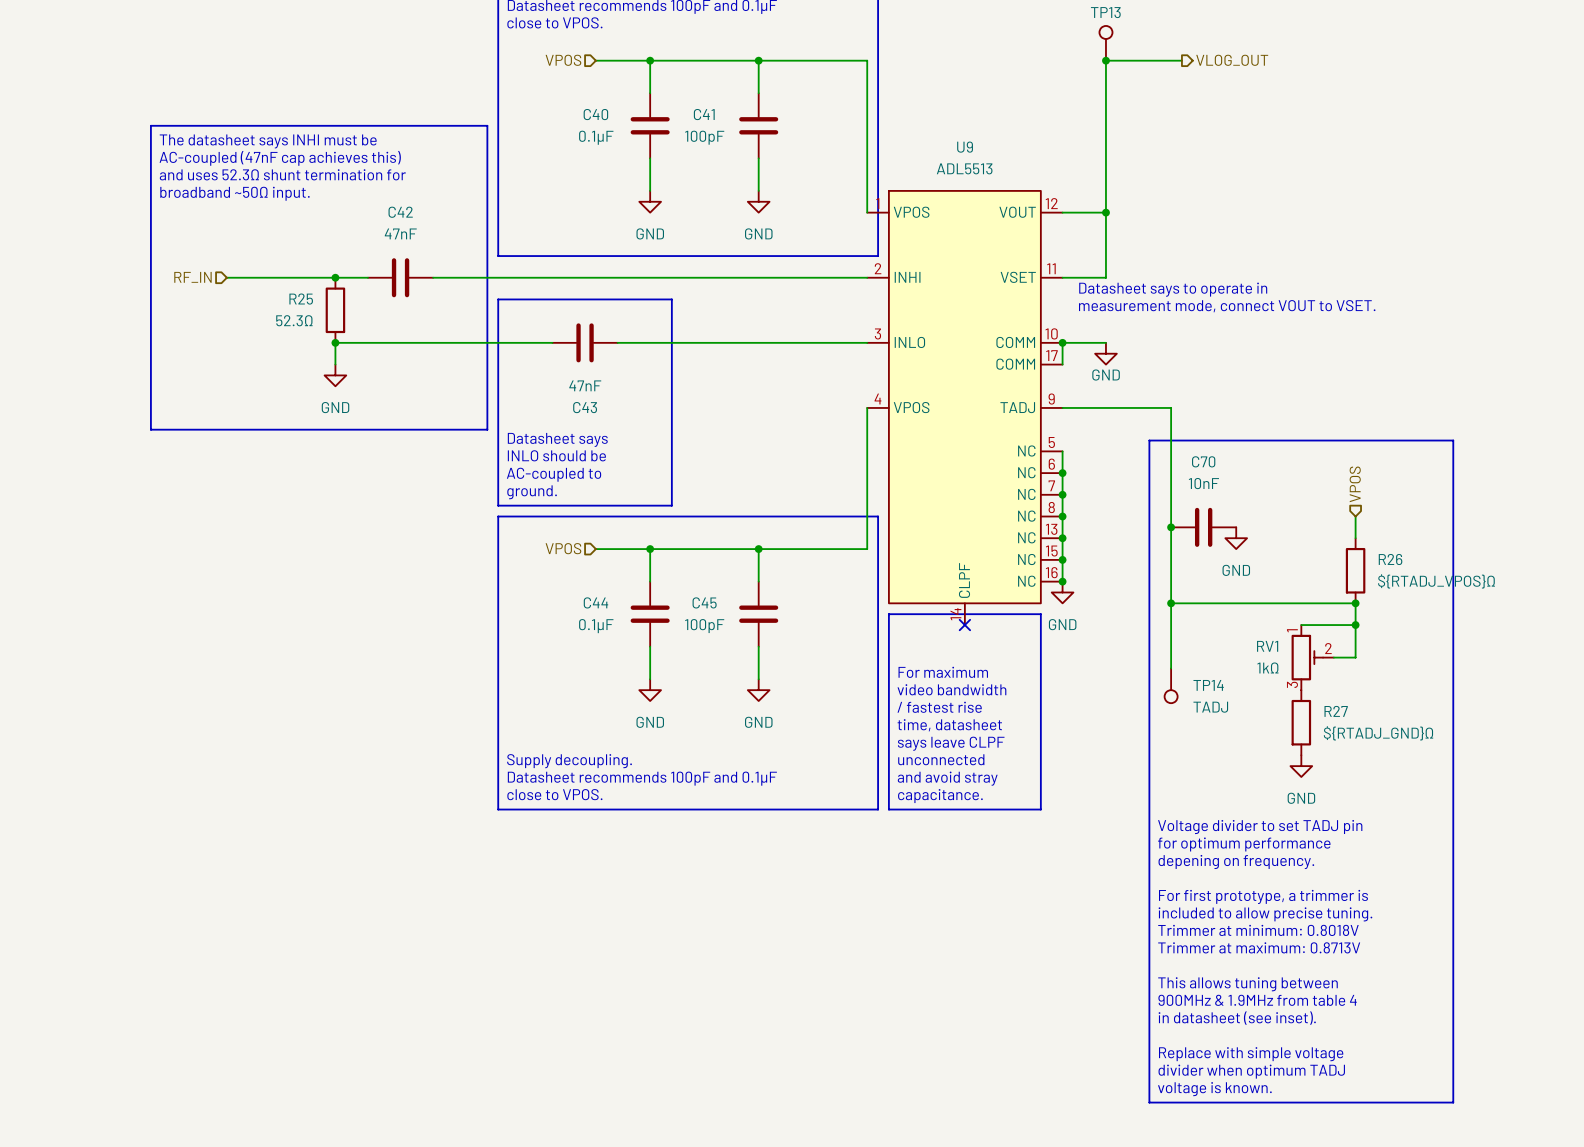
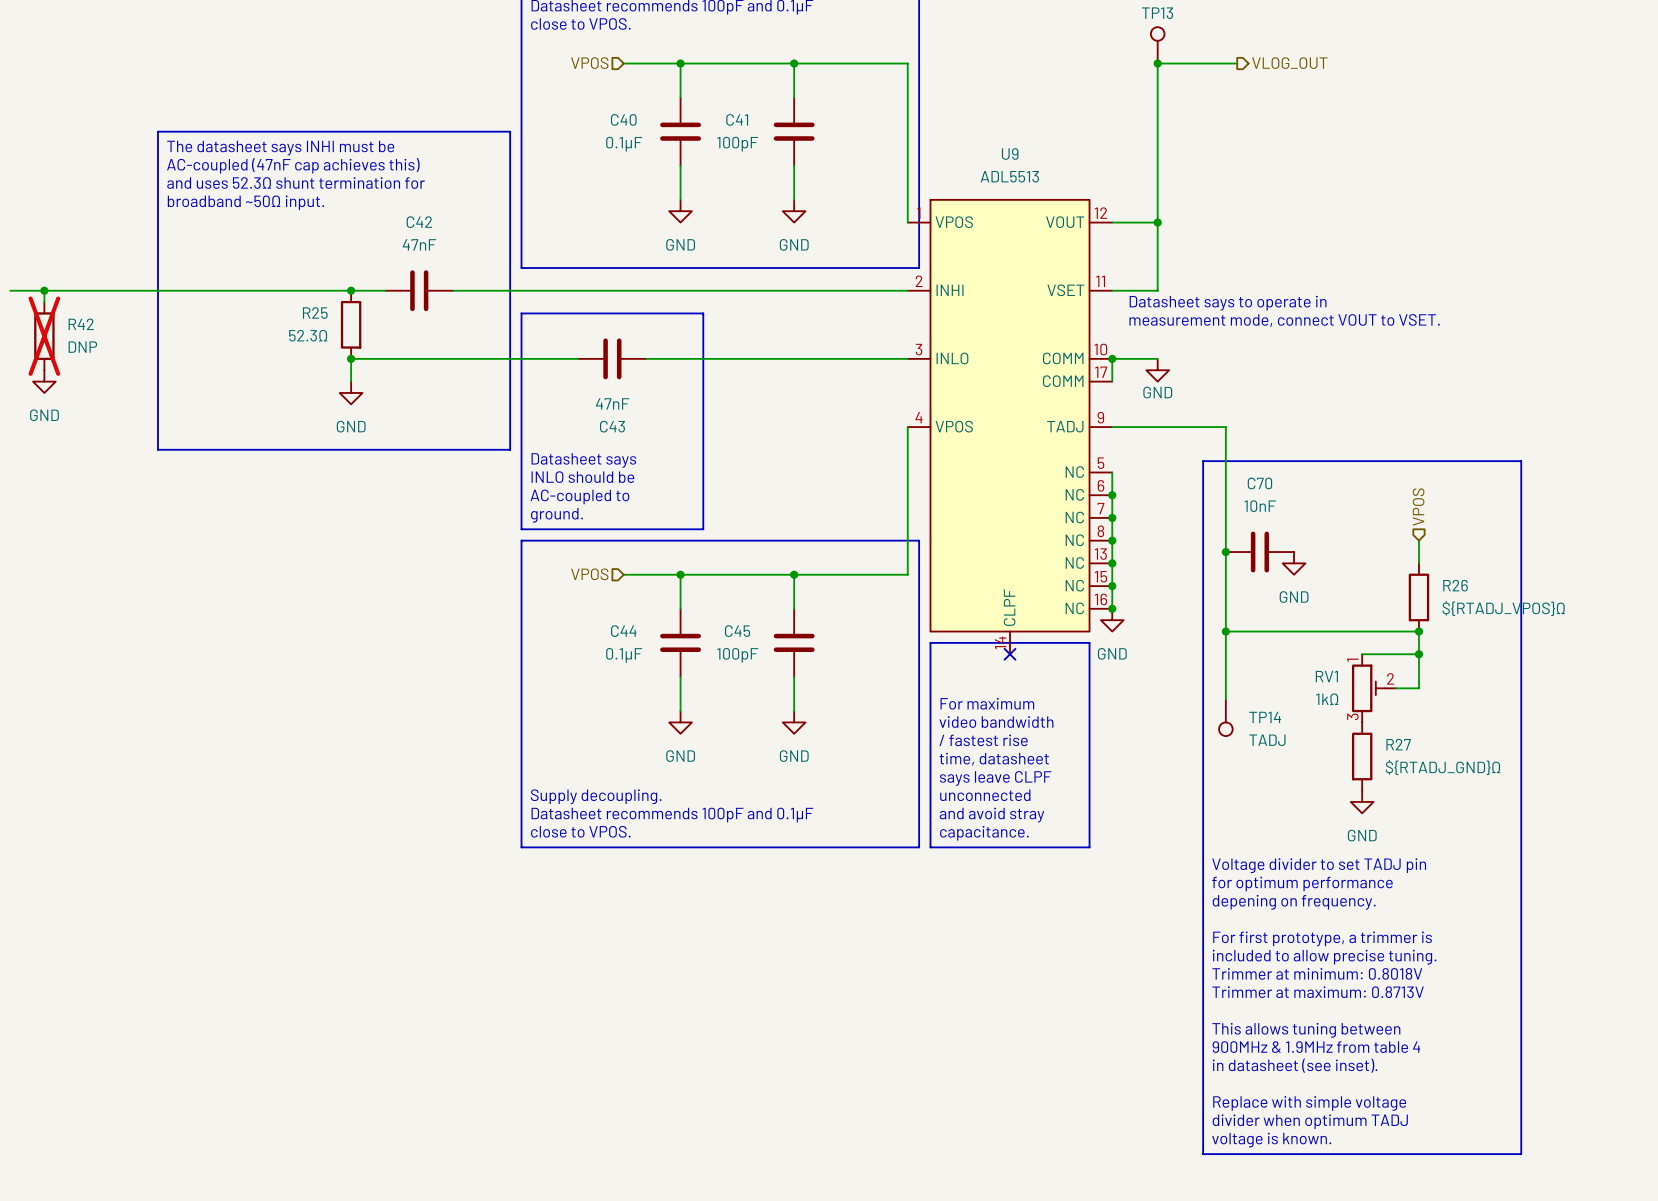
wire: none -> (10, 290) (237, 290)
wire: none -> (44, 290) (44, 302)
junction: none -> (44, 290)
hierarchical label: RF_IN (192, 277) -> none
R42: none -> DNP (44, 336)
power symbol: none -> GND (44, 381)

